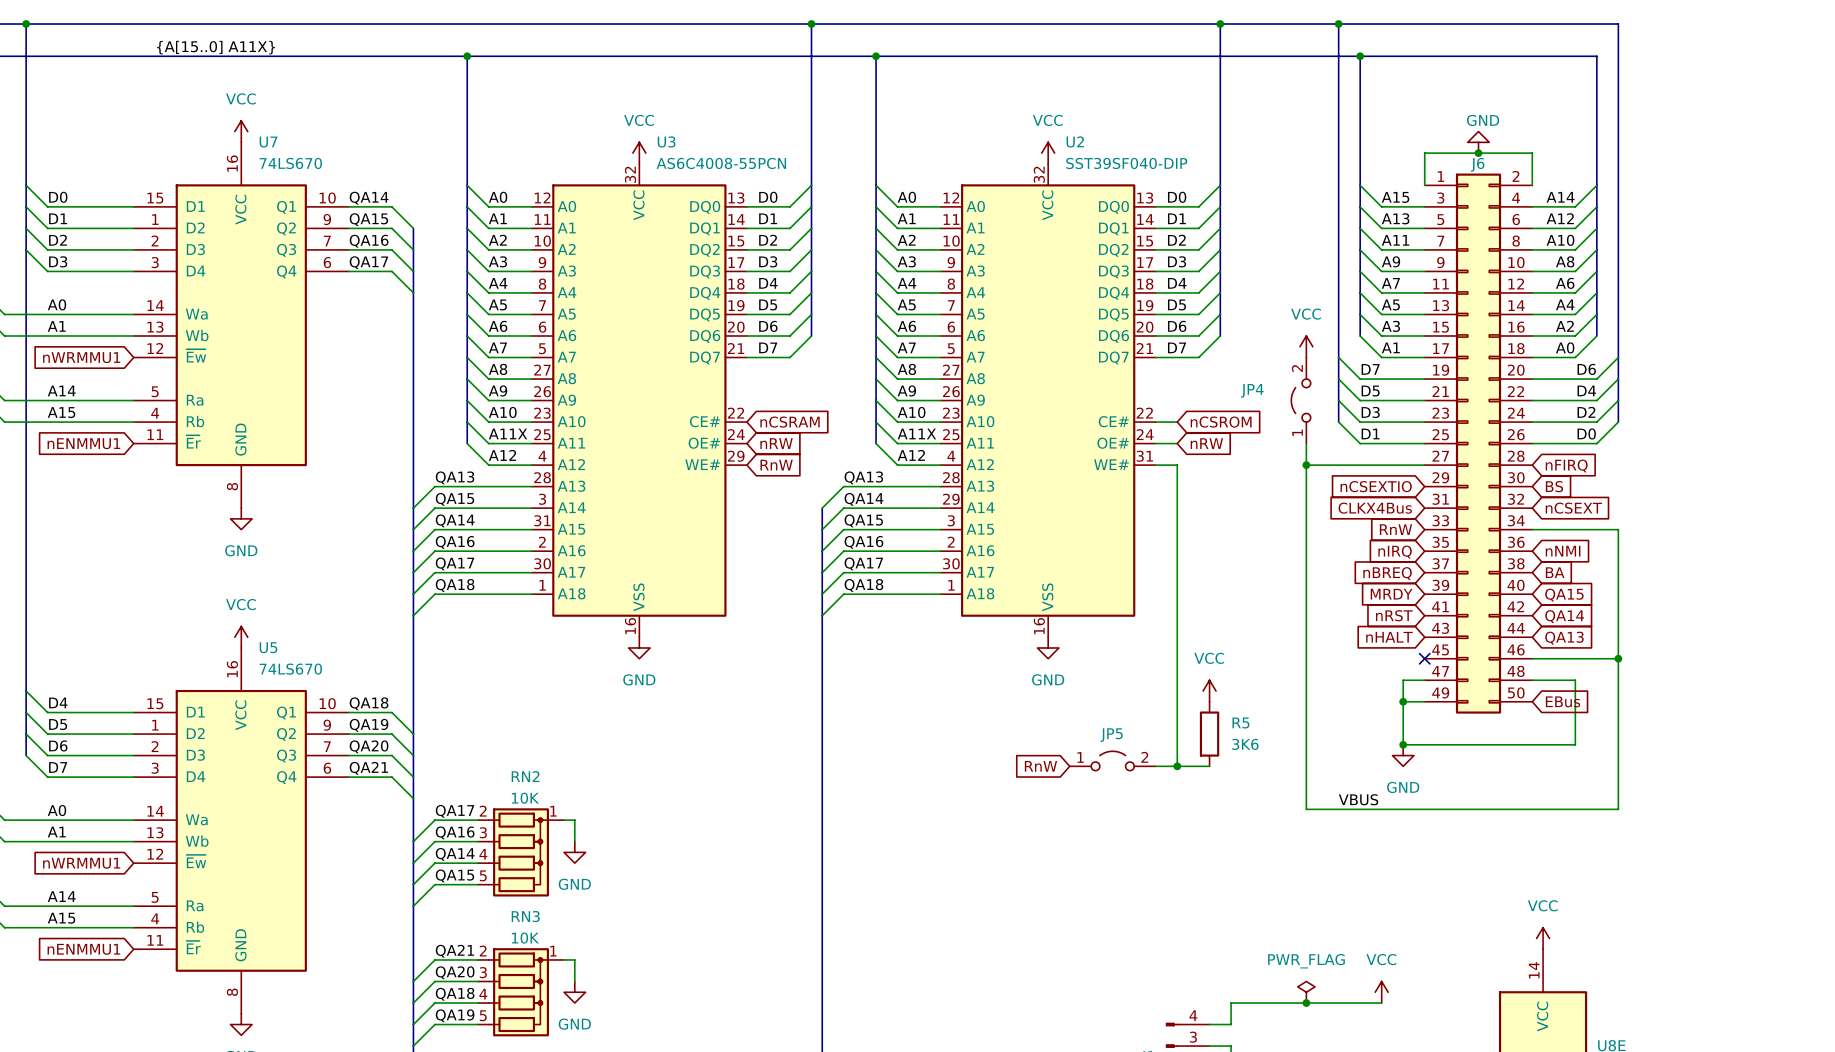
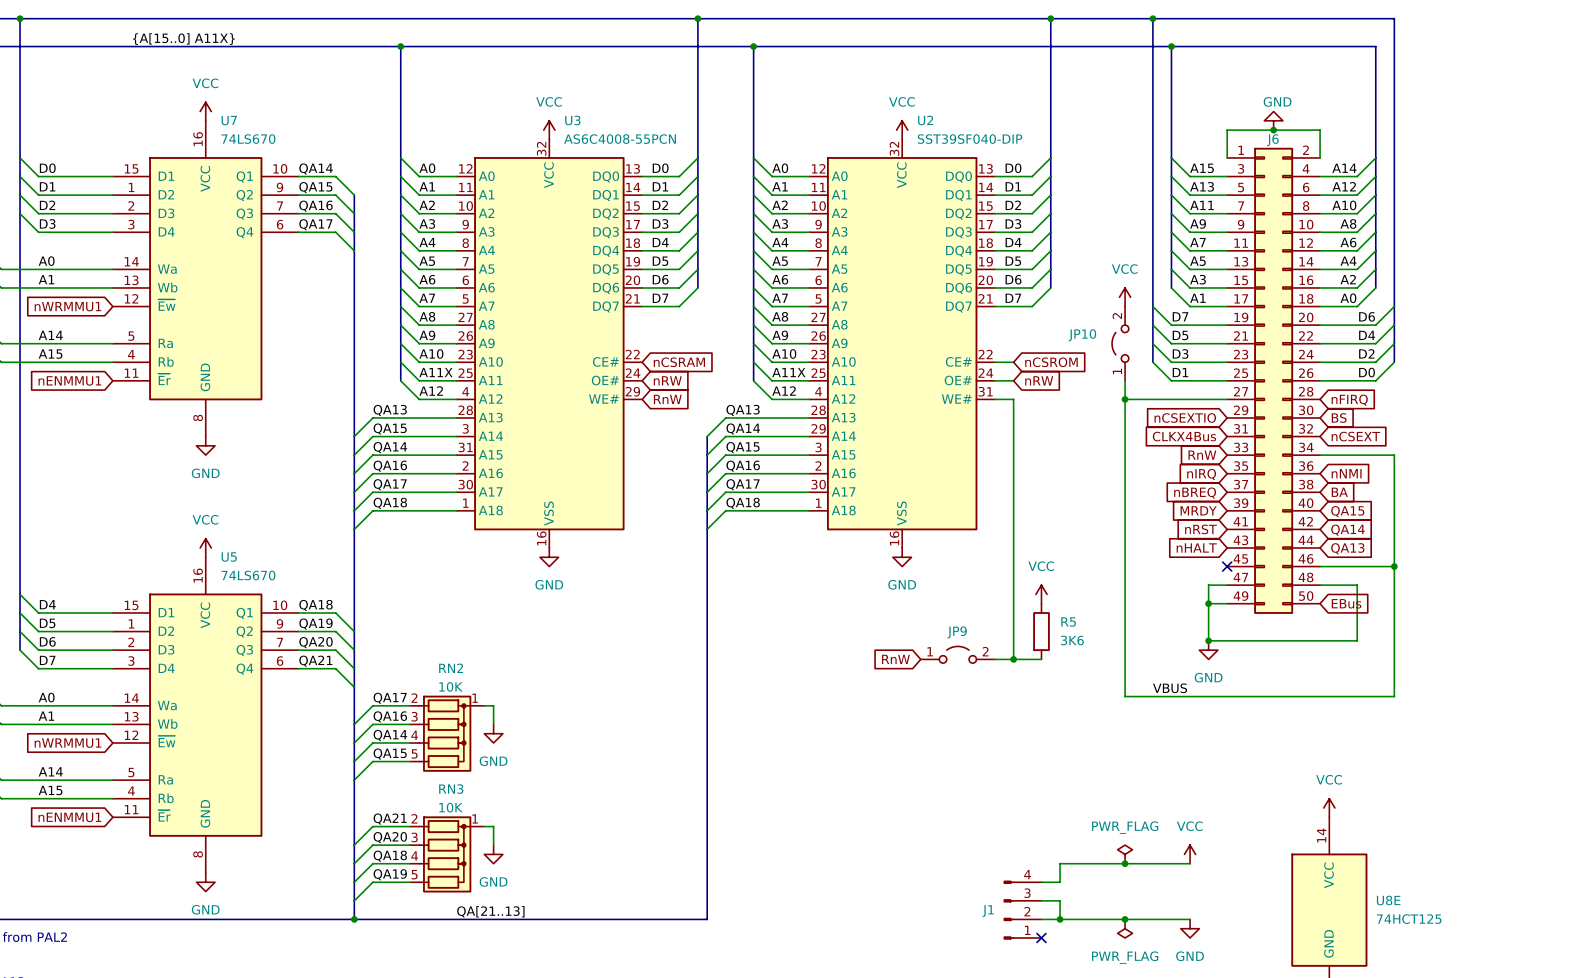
JP4 name: JP4 (1252, 390) -> JP10 (1082, 335)
JP5 name: JP5 (1111, 735) -> JP9 (957, 632)

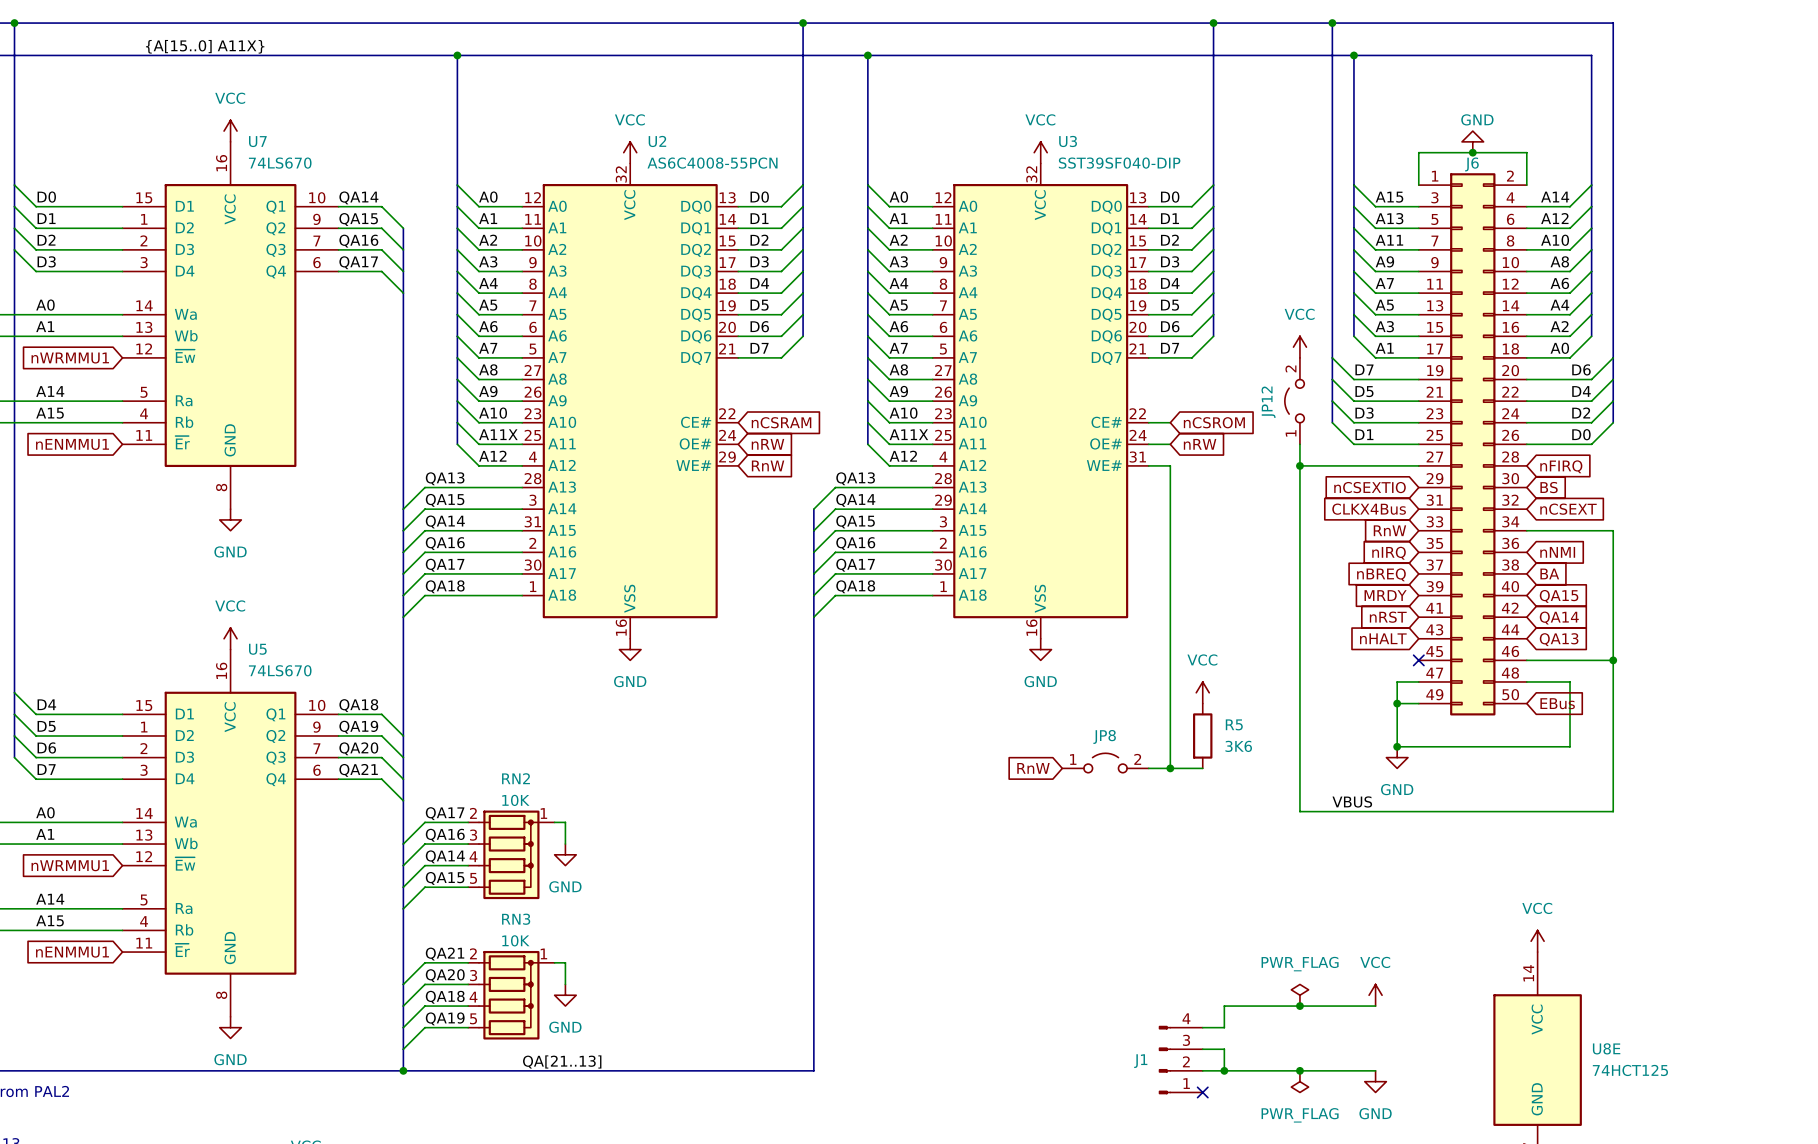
U3 name: U3 (572, 120) -> U2 (657, 141)
U2 name: U2 (925, 120) -> U3 (1068, 141)
JP10 name: JP10 (1082, 335) -> JP12 (1268, 402)
JP9 name: JP9 (957, 632) -> JP8 (1104, 736)

